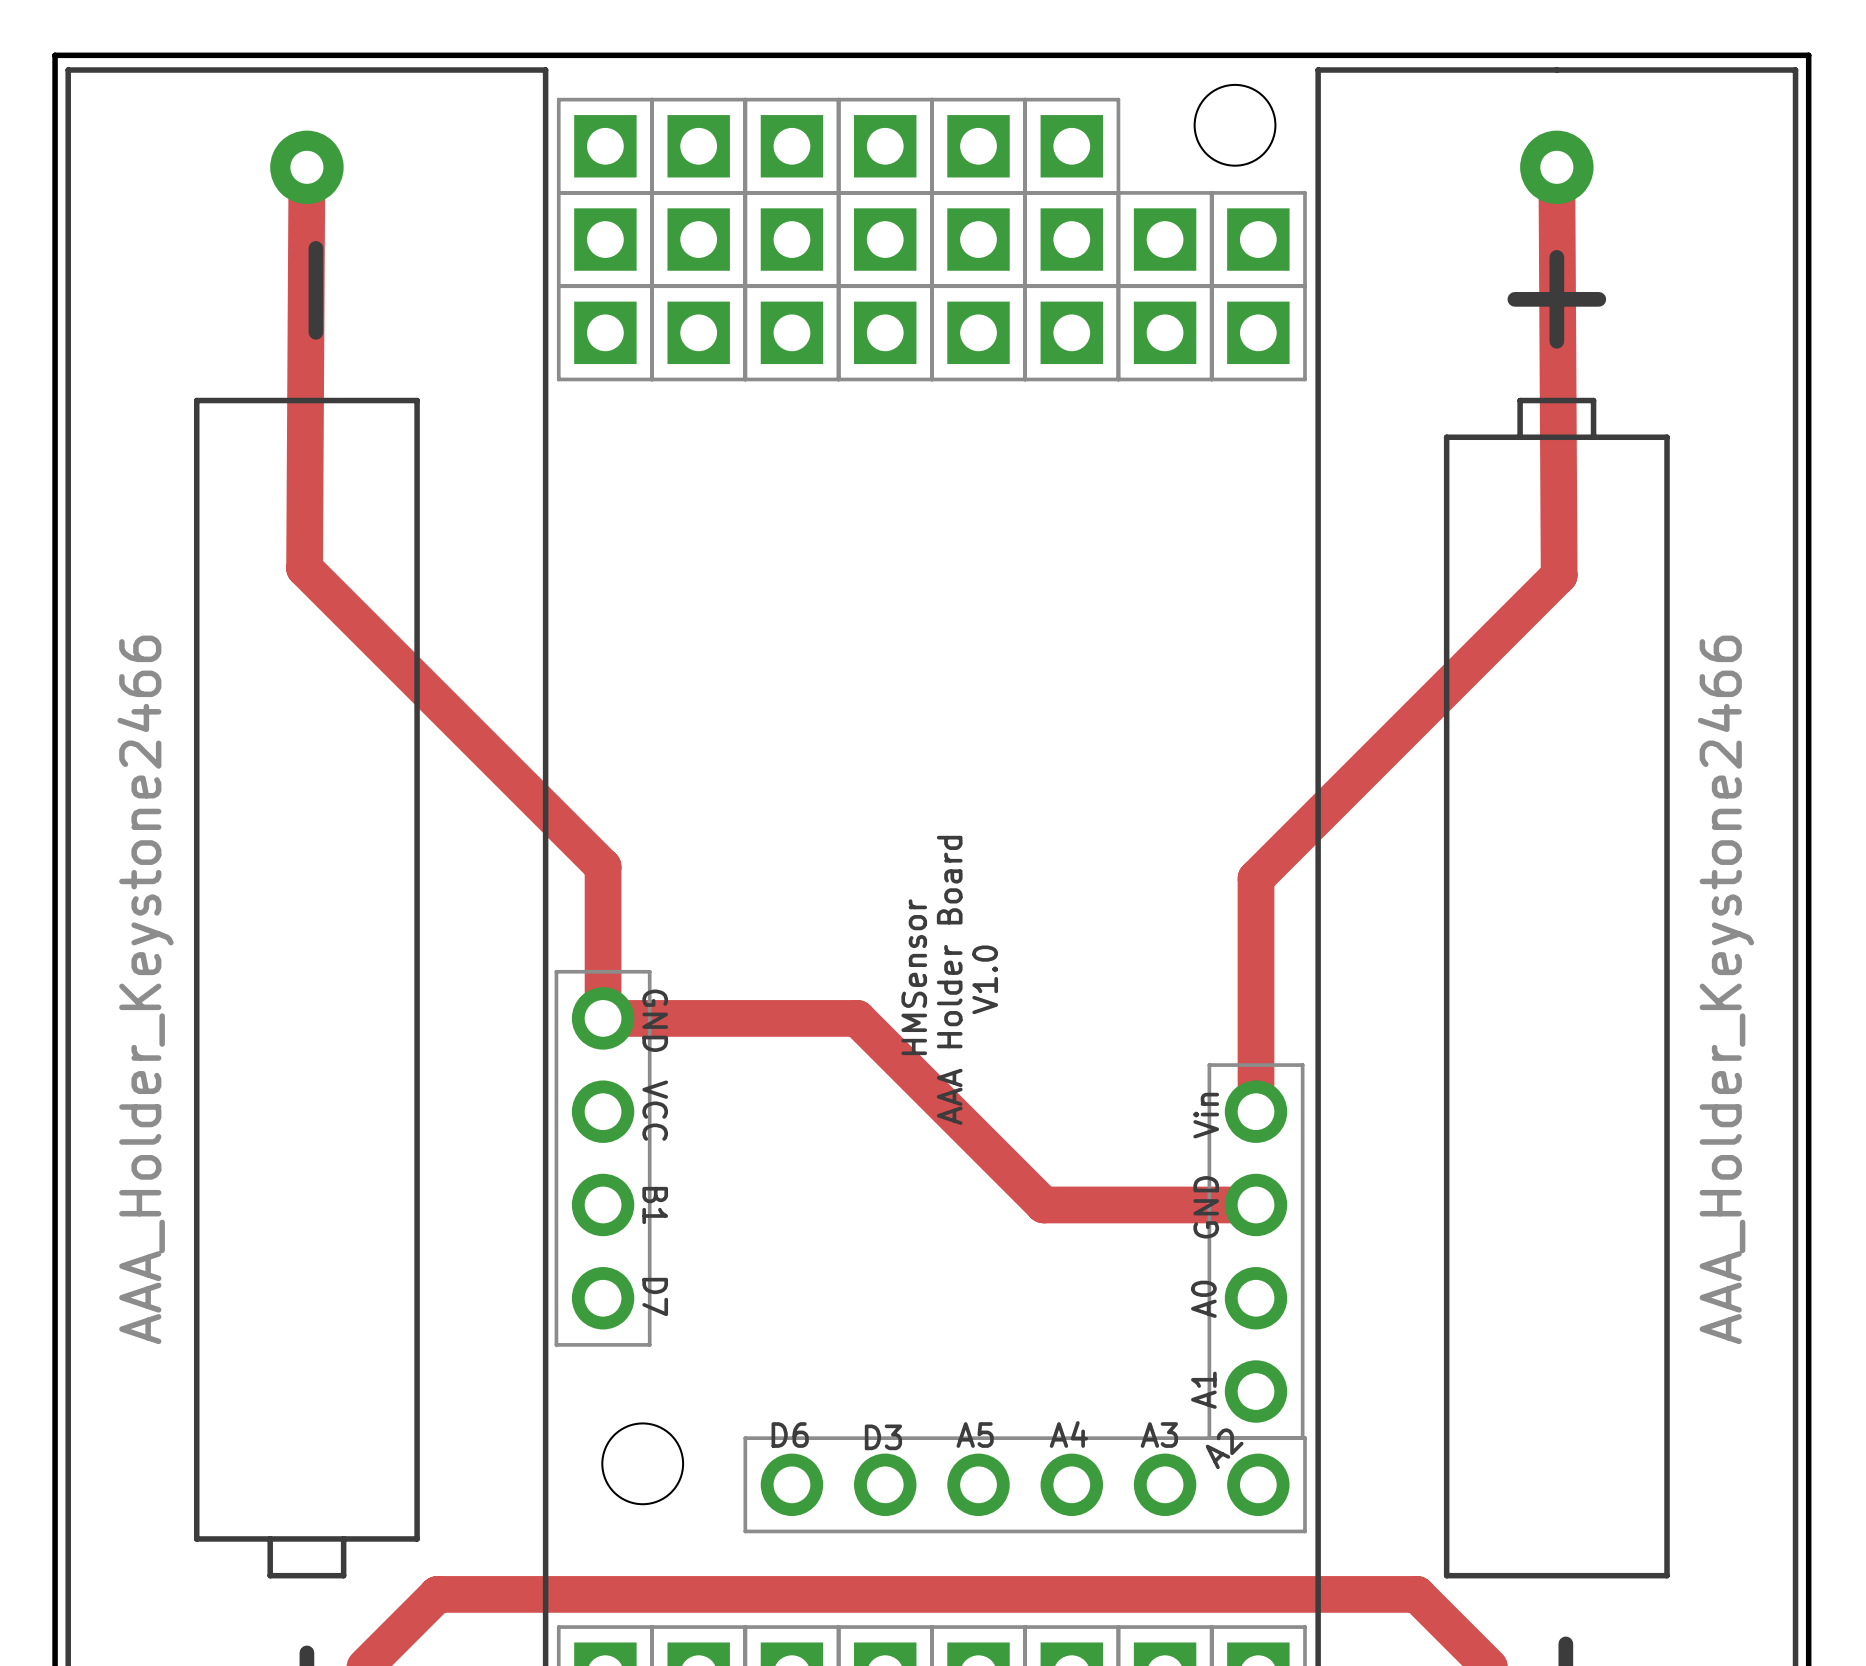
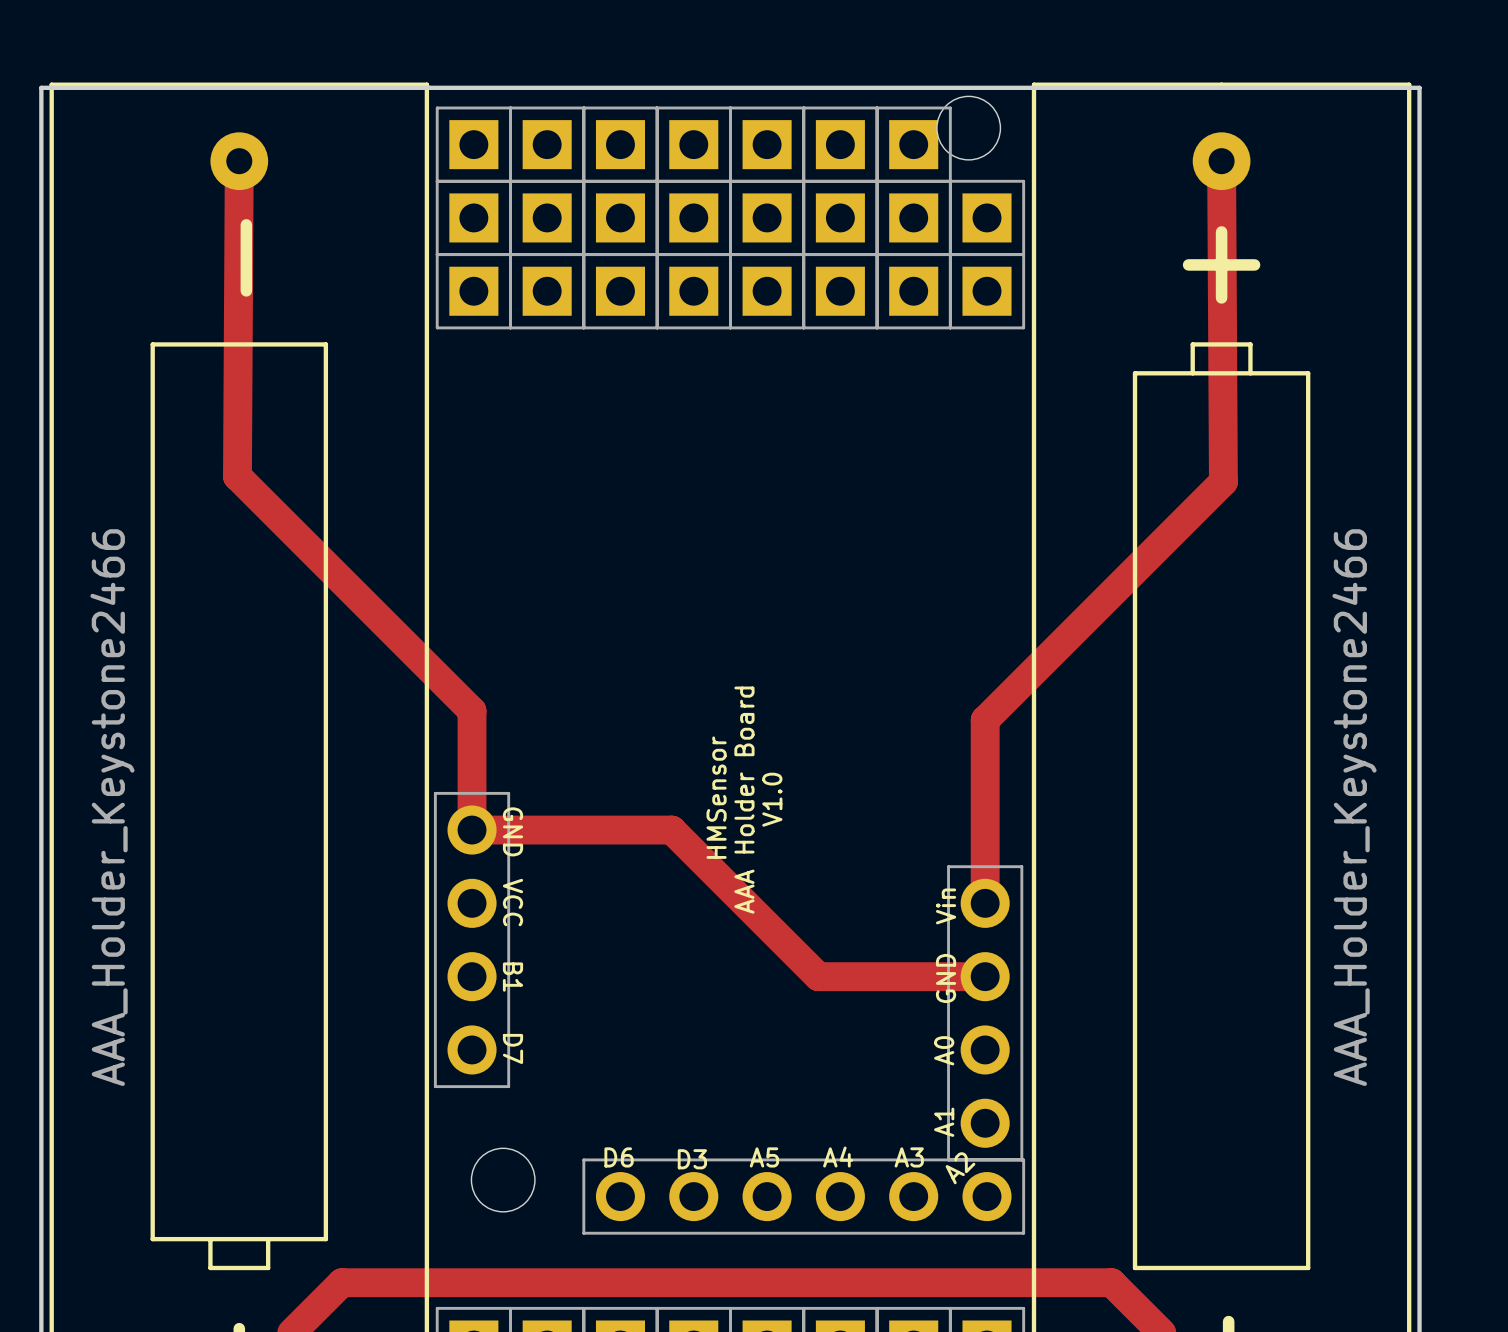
board edge: (55, 73) (55, 55) (1808, 55) (1808, 73) -> (41, 87) (1419, 87)
part: none -> (913, 144)

